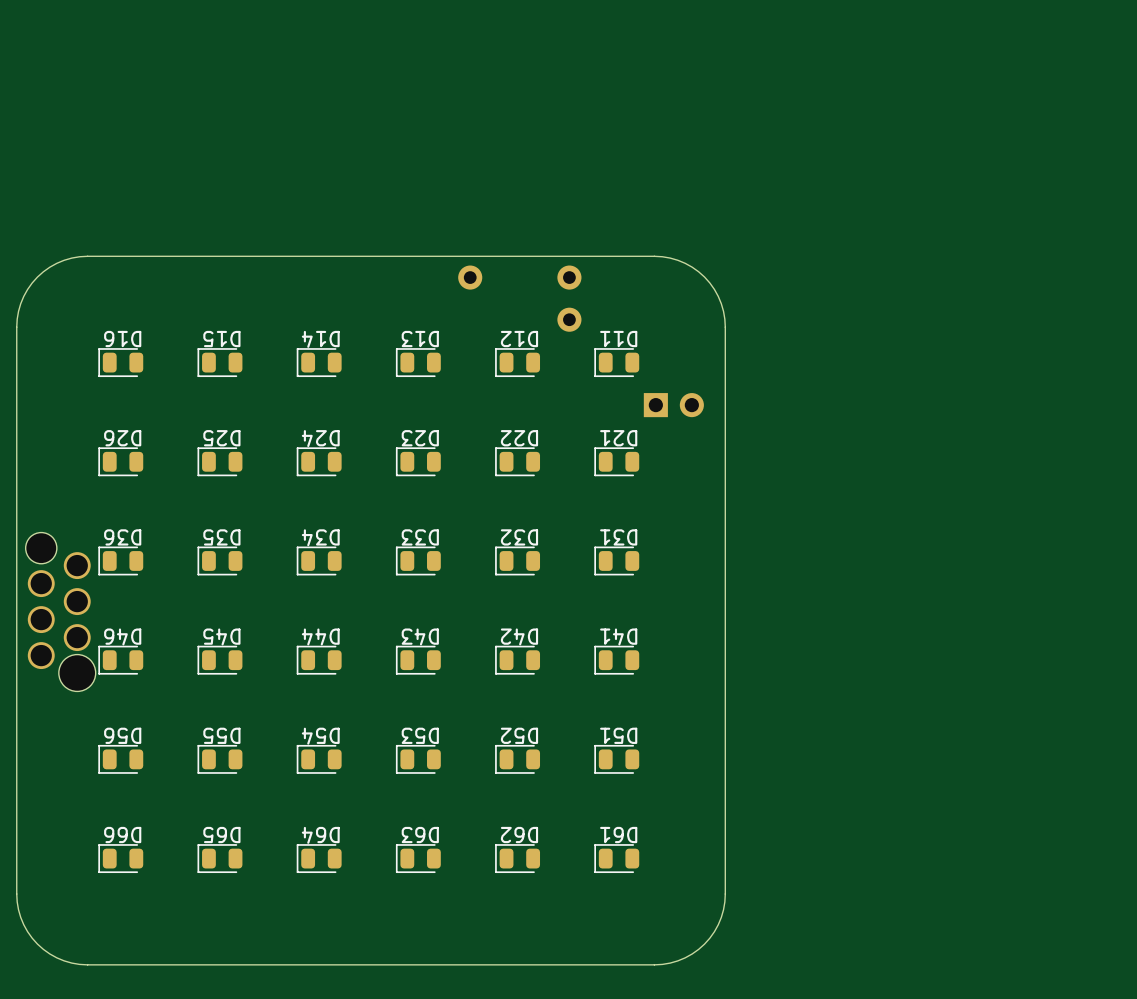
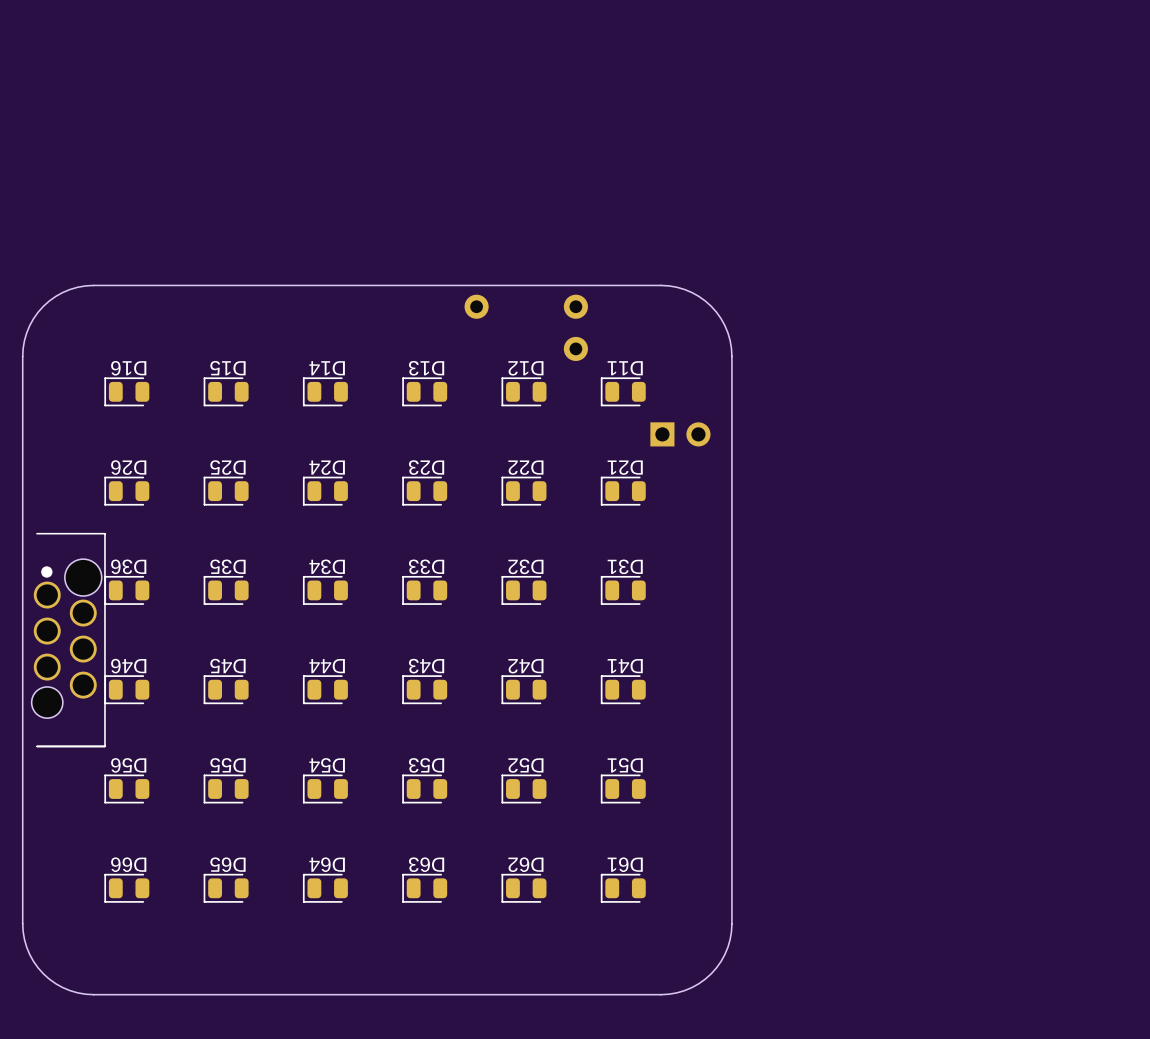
part side: top (60, 612) -> bottom (68, 640)

